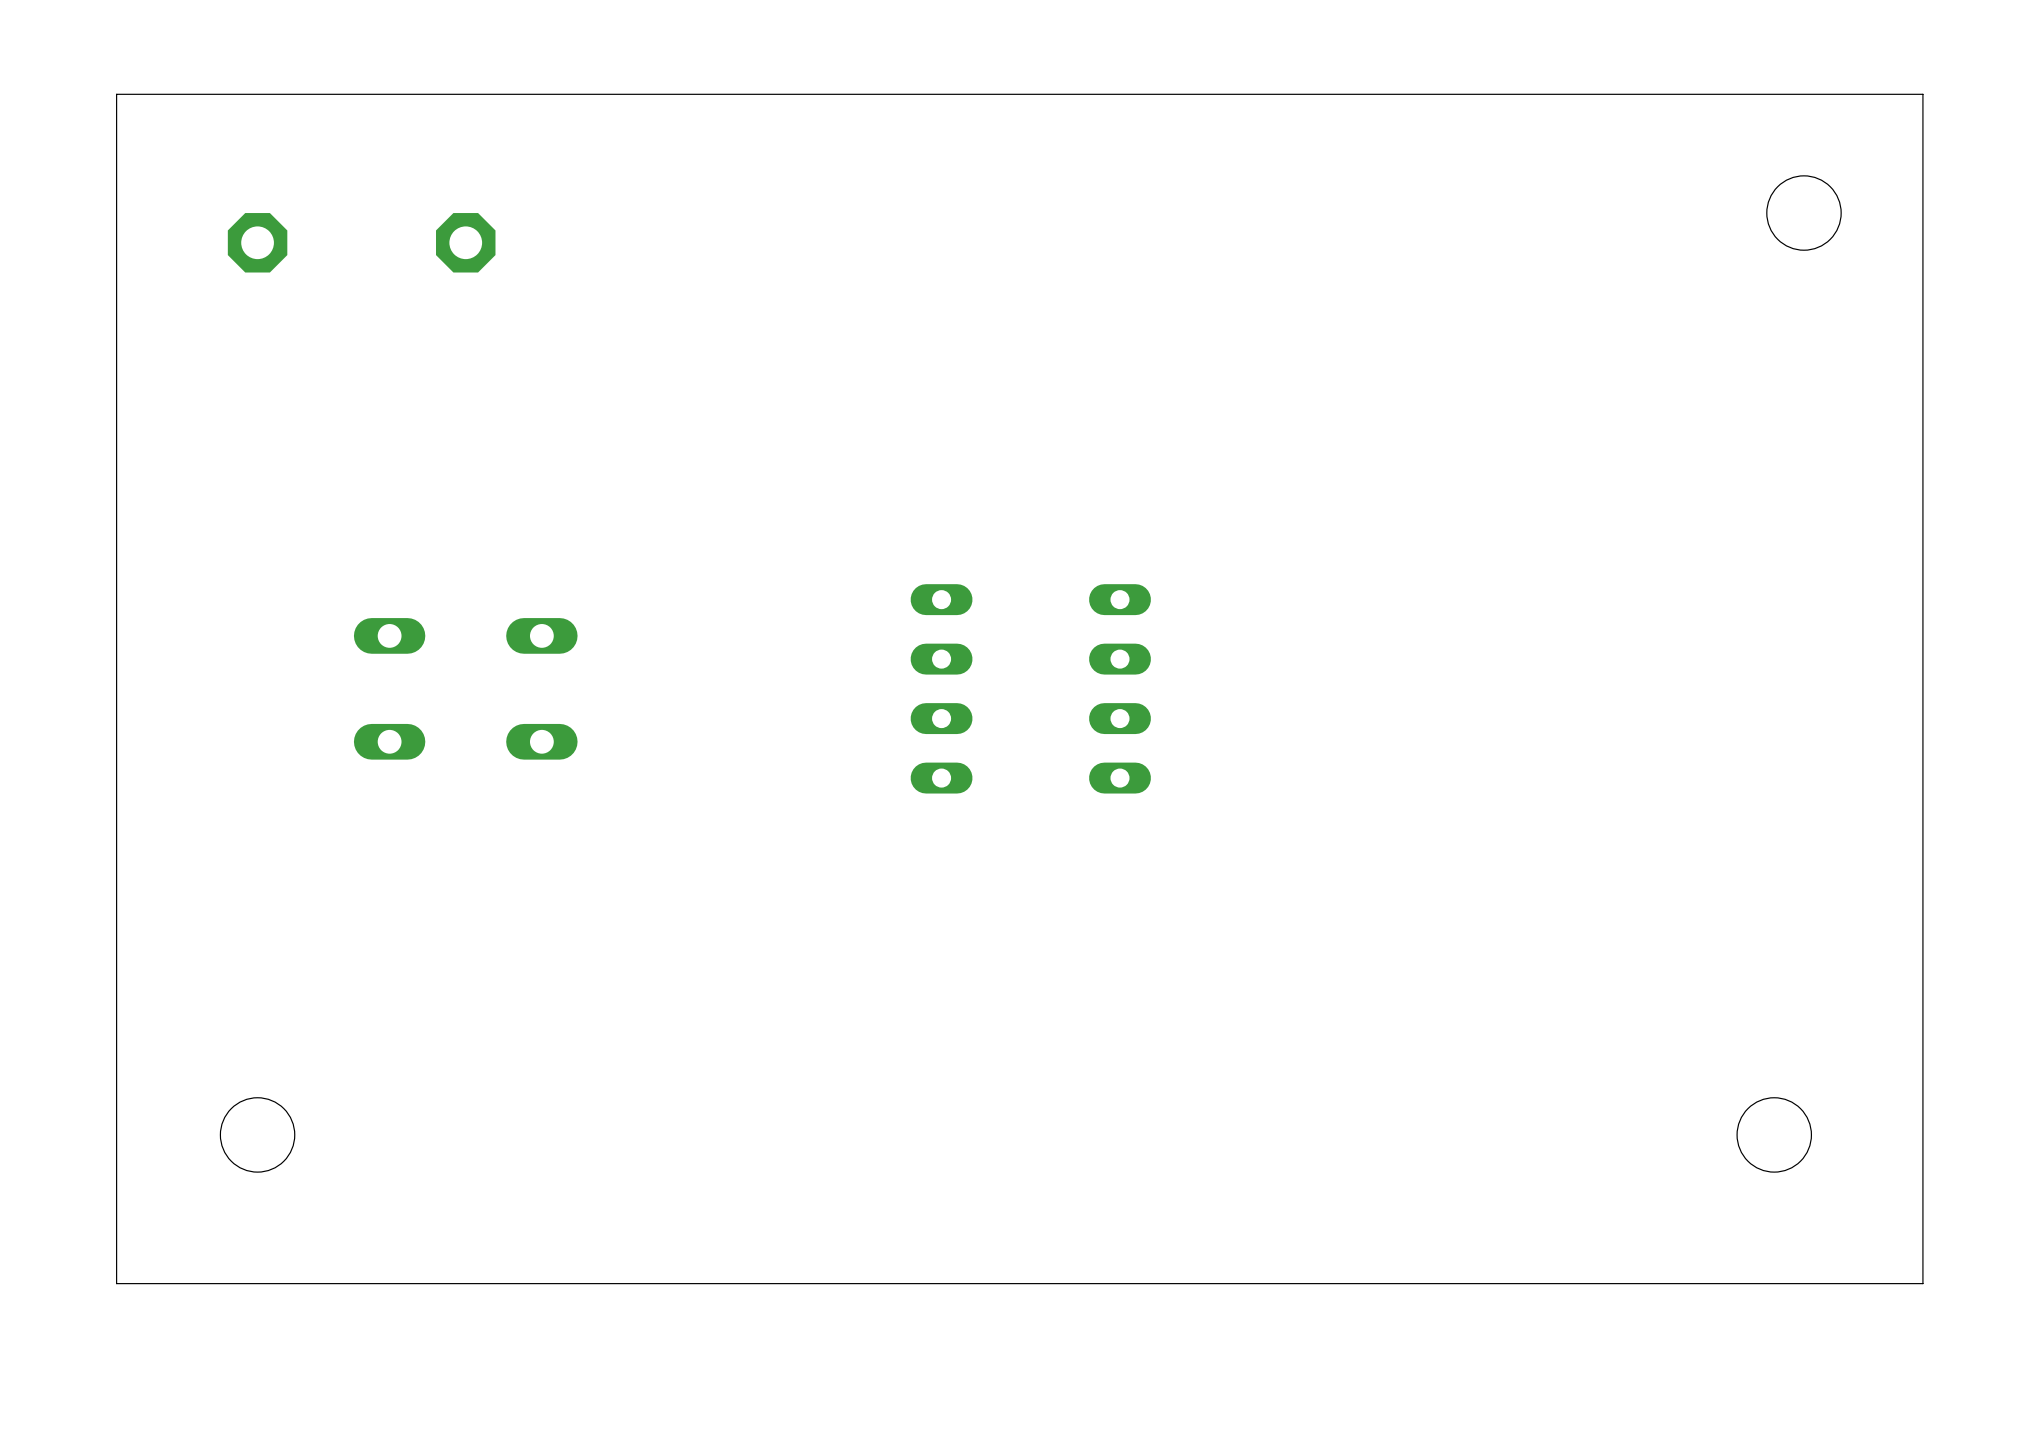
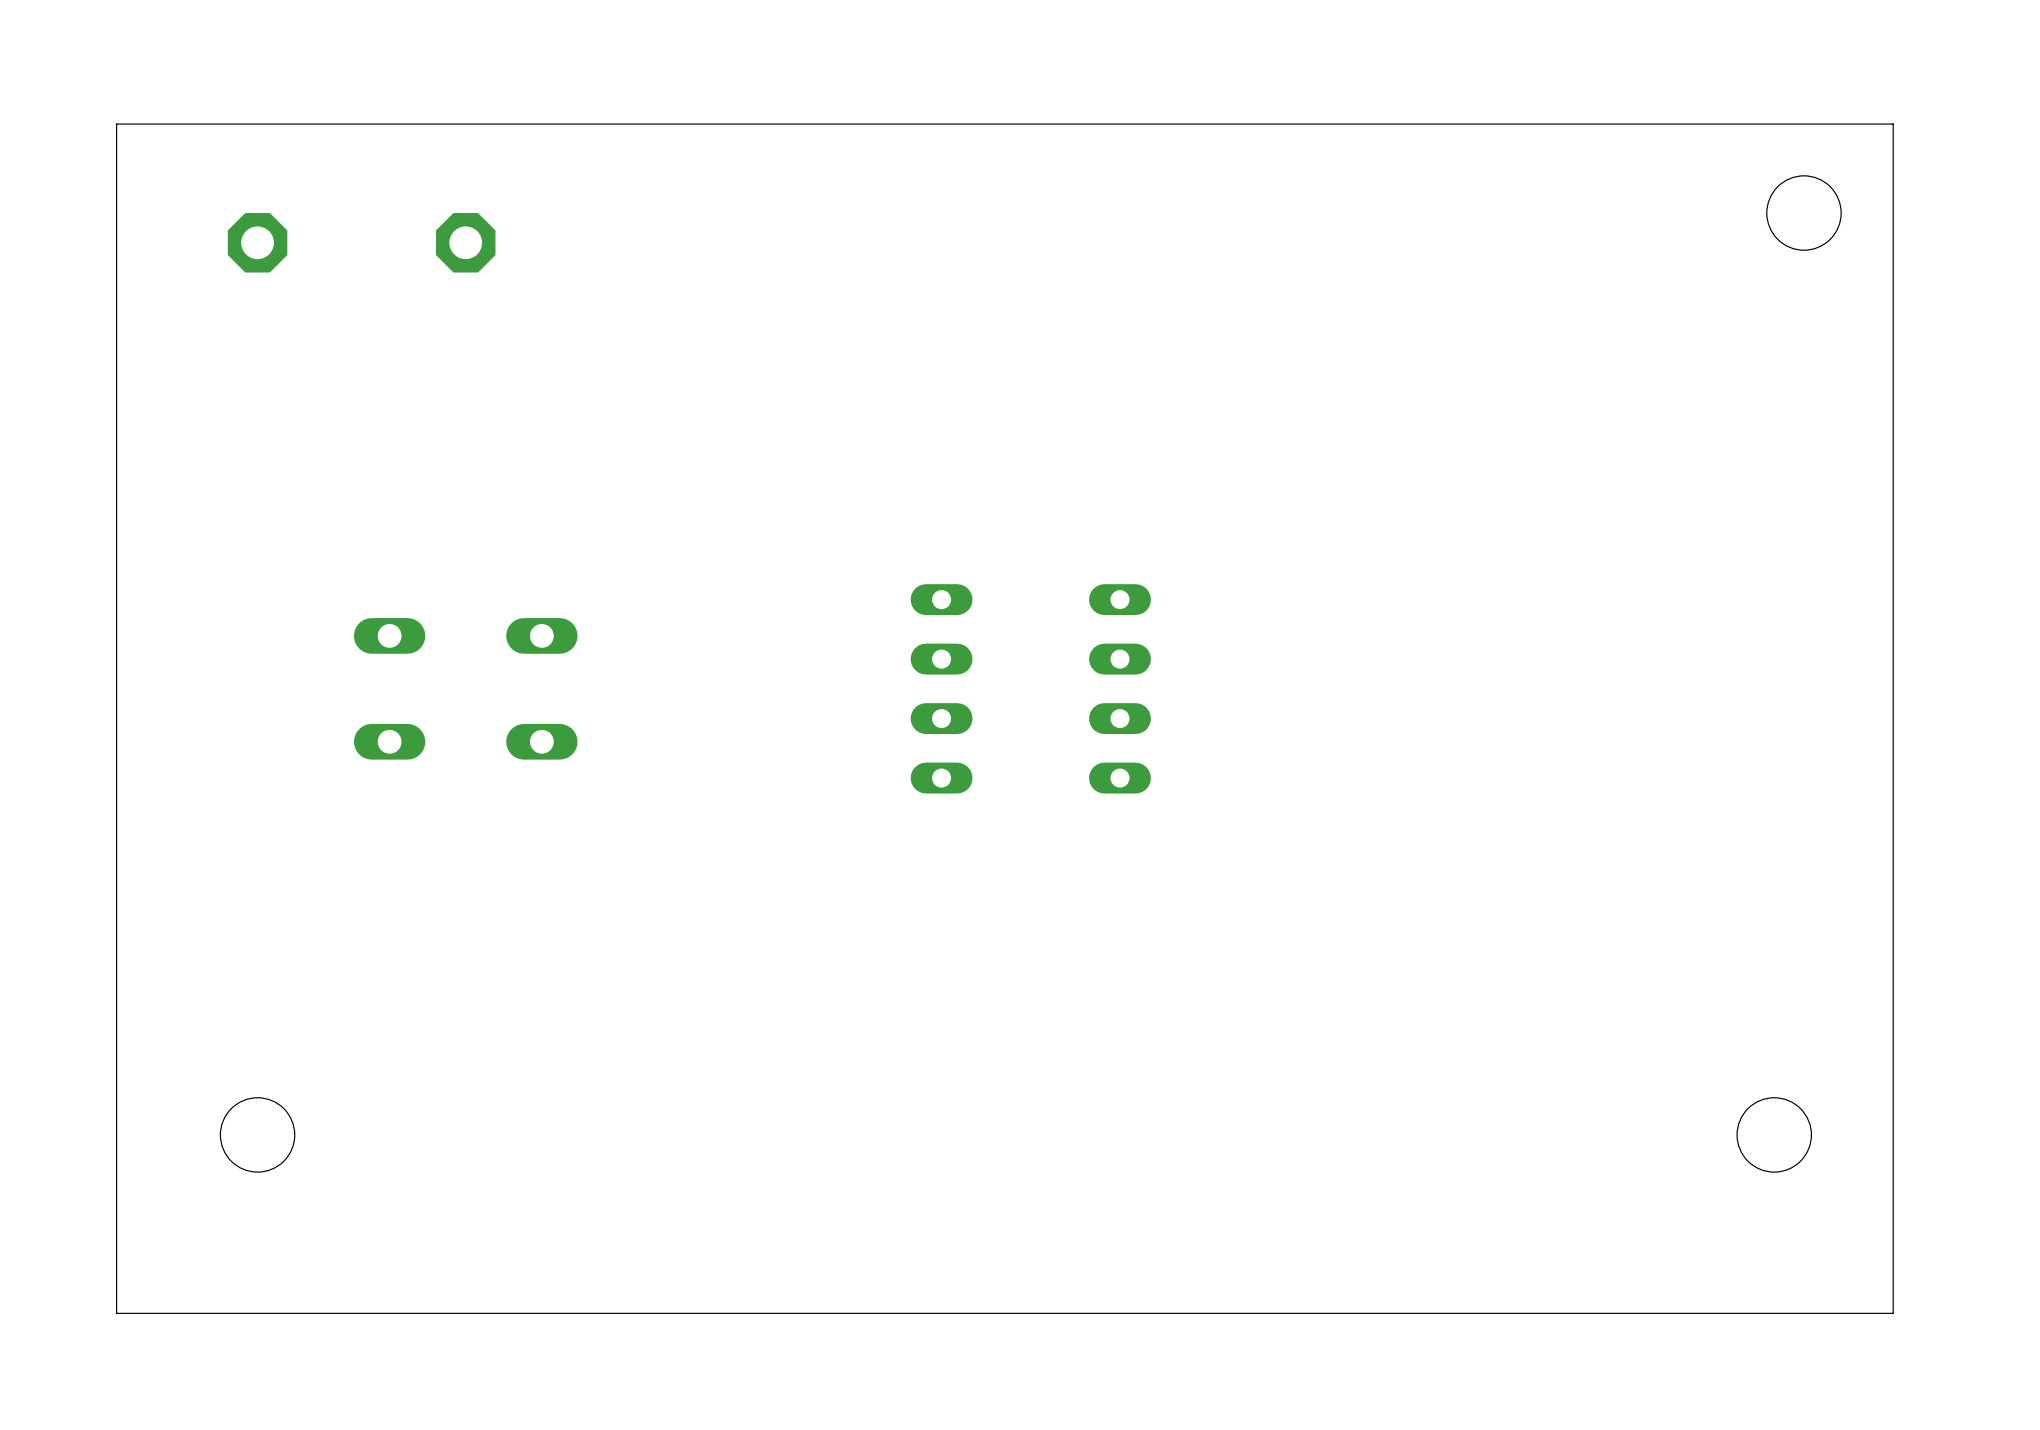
board edge: (116, 124) (116, 94) (1922, 94) (1922, 1283) (116, 1283) -> (116, 124) (1893, 124) (1893, 1313) (116, 1313) (116, 1283)

